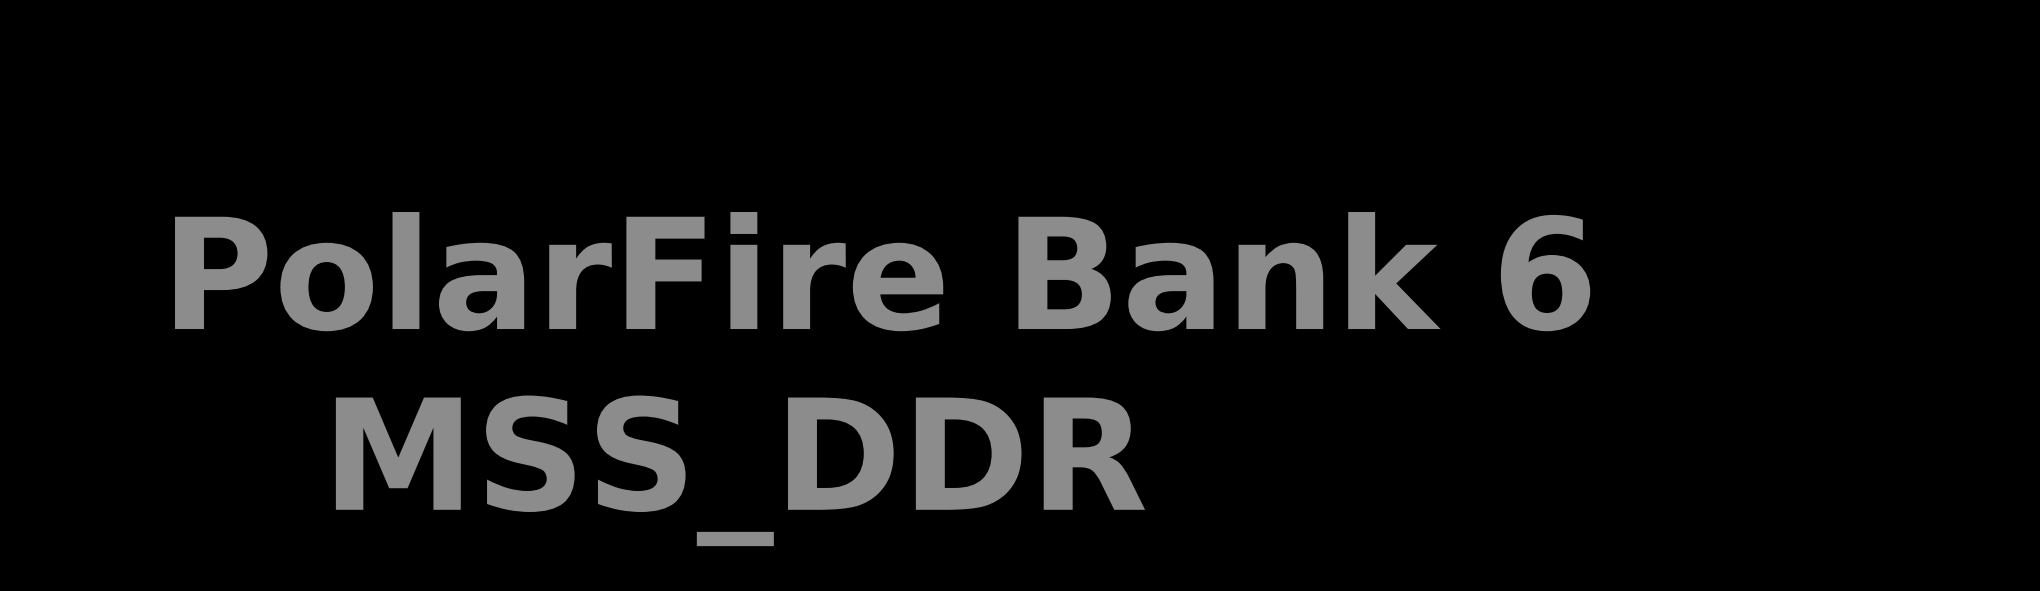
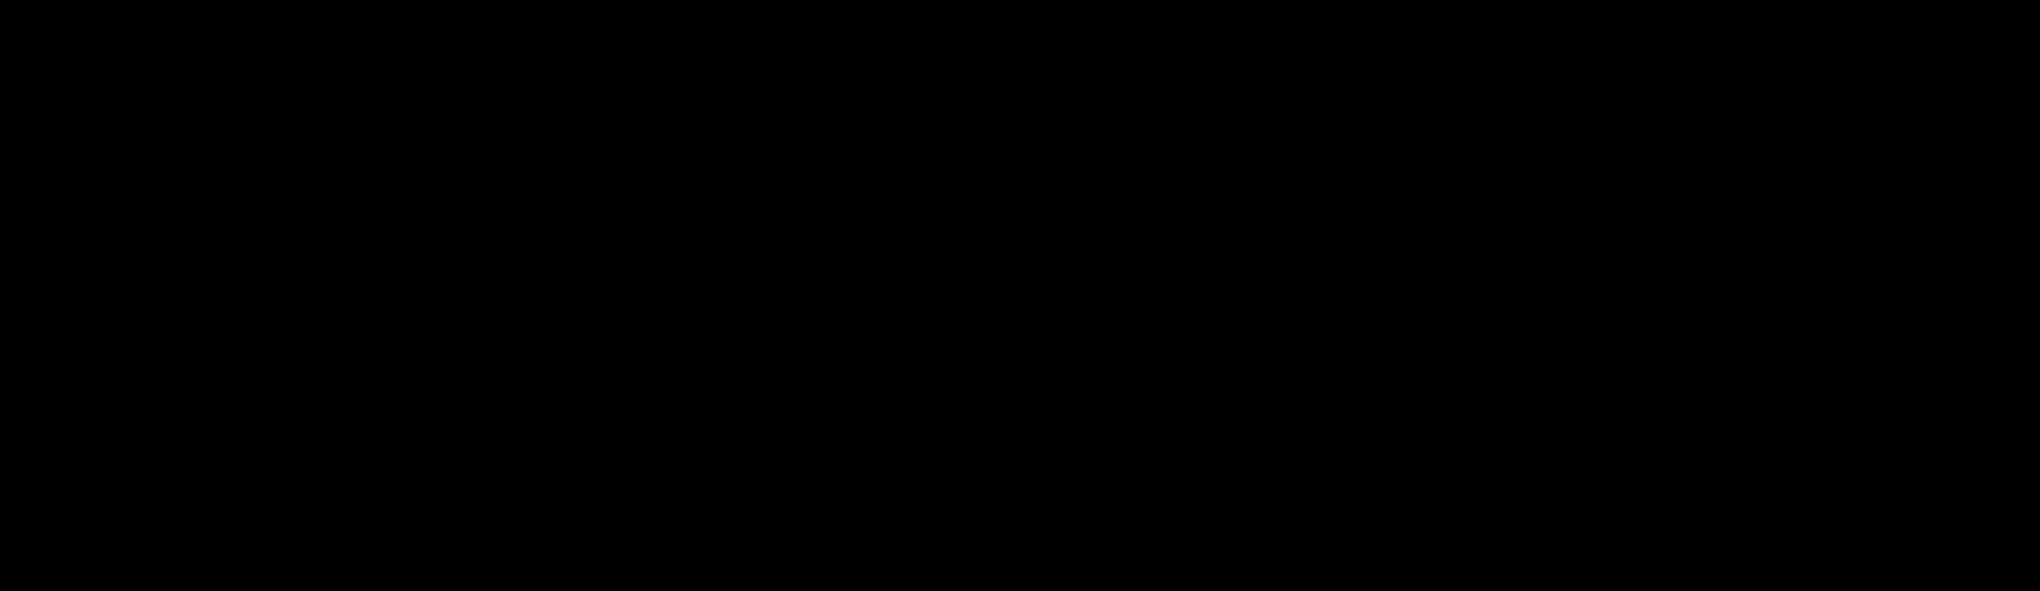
text: PolarFire Bank 6 (882, 271) -> none
text: MSS_DDR (740, 470) -> none

